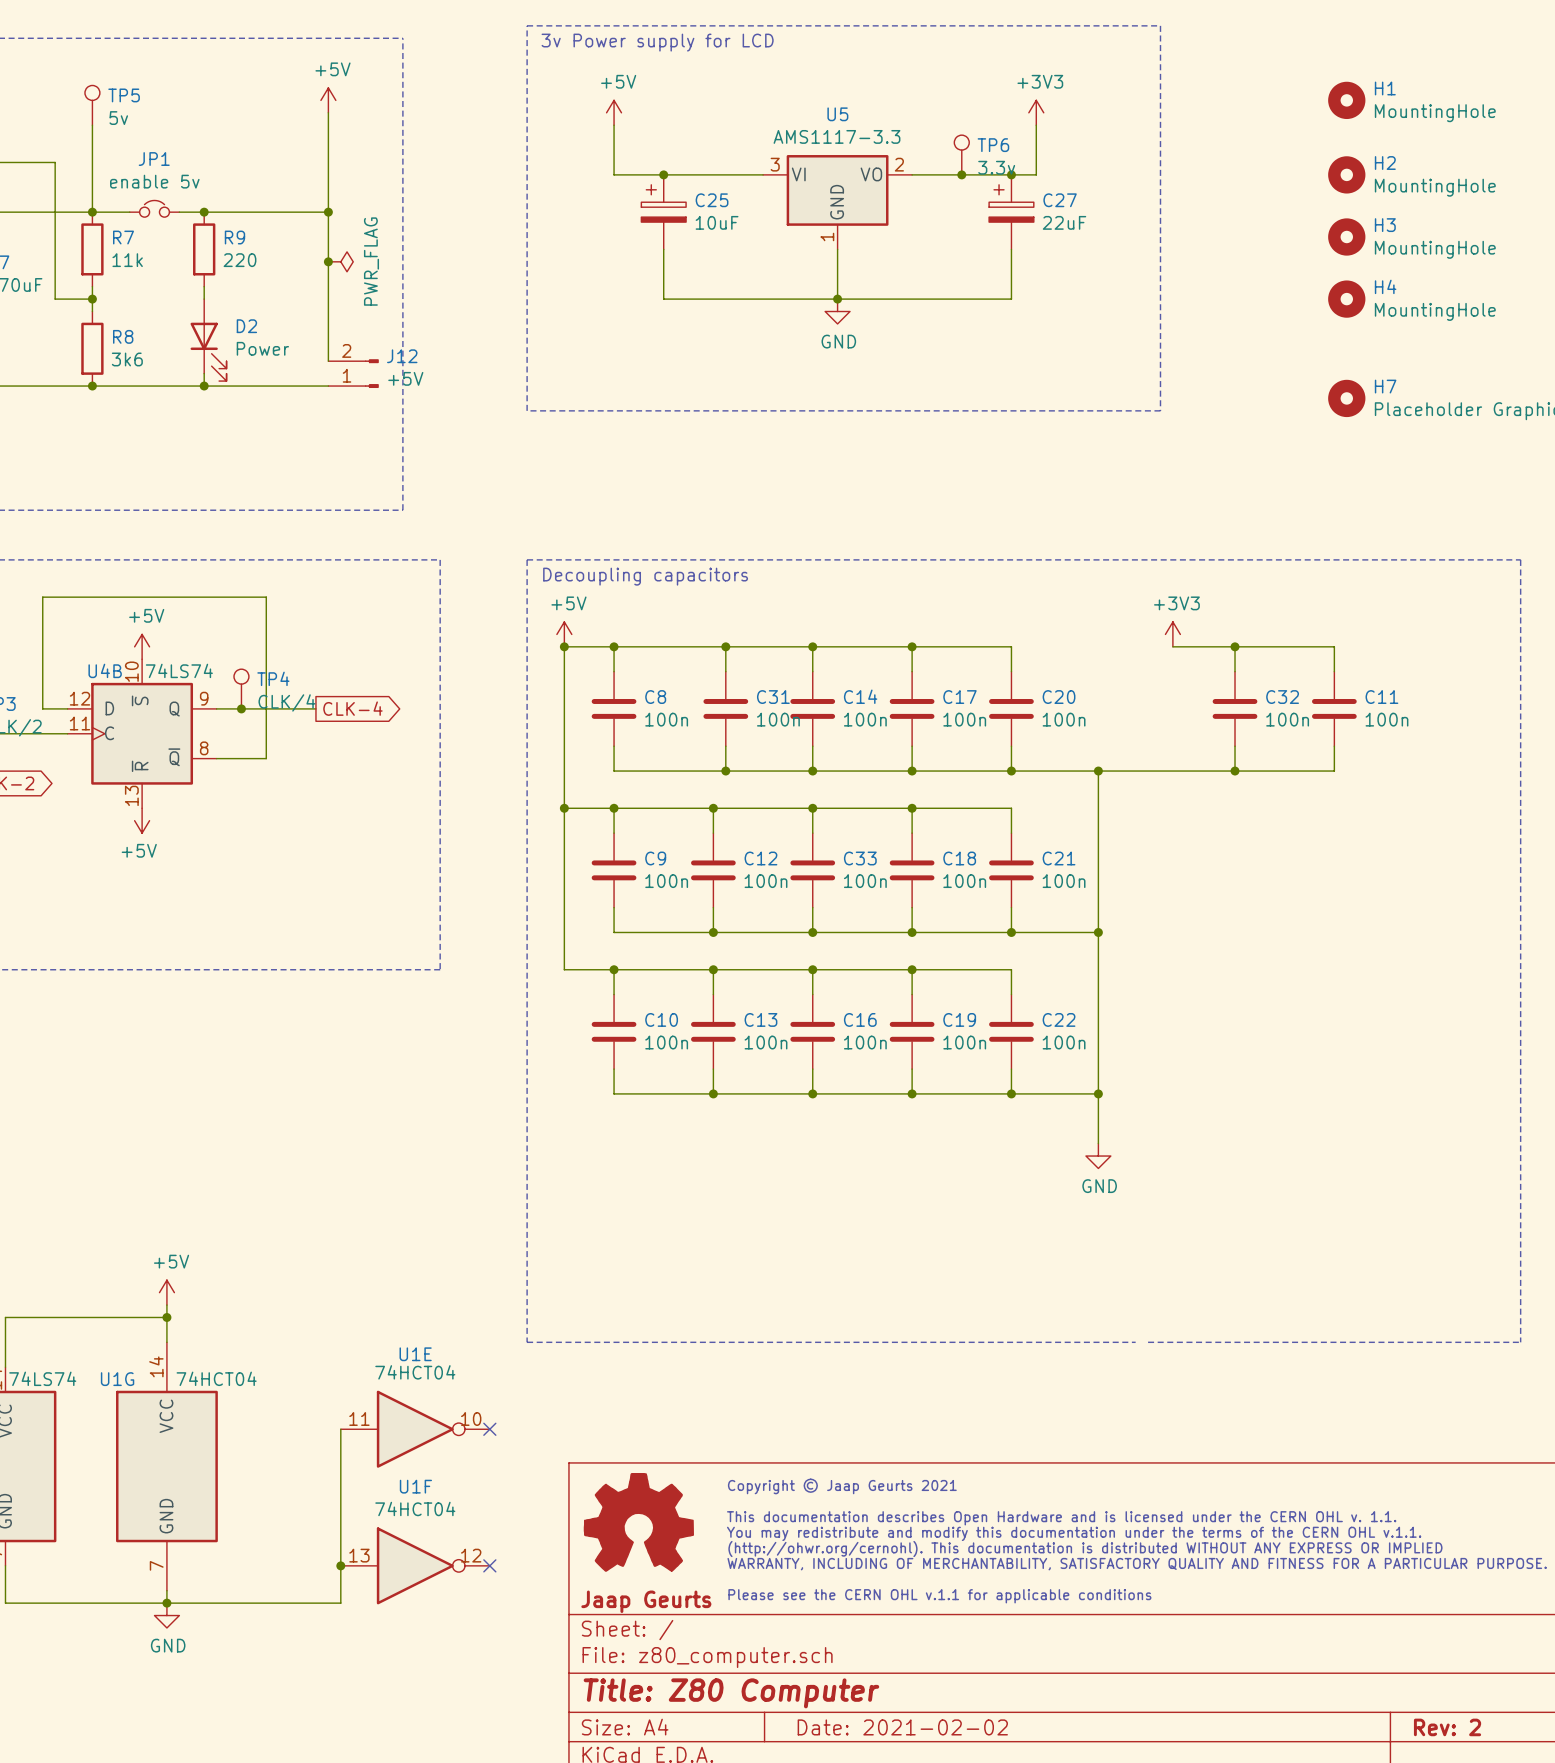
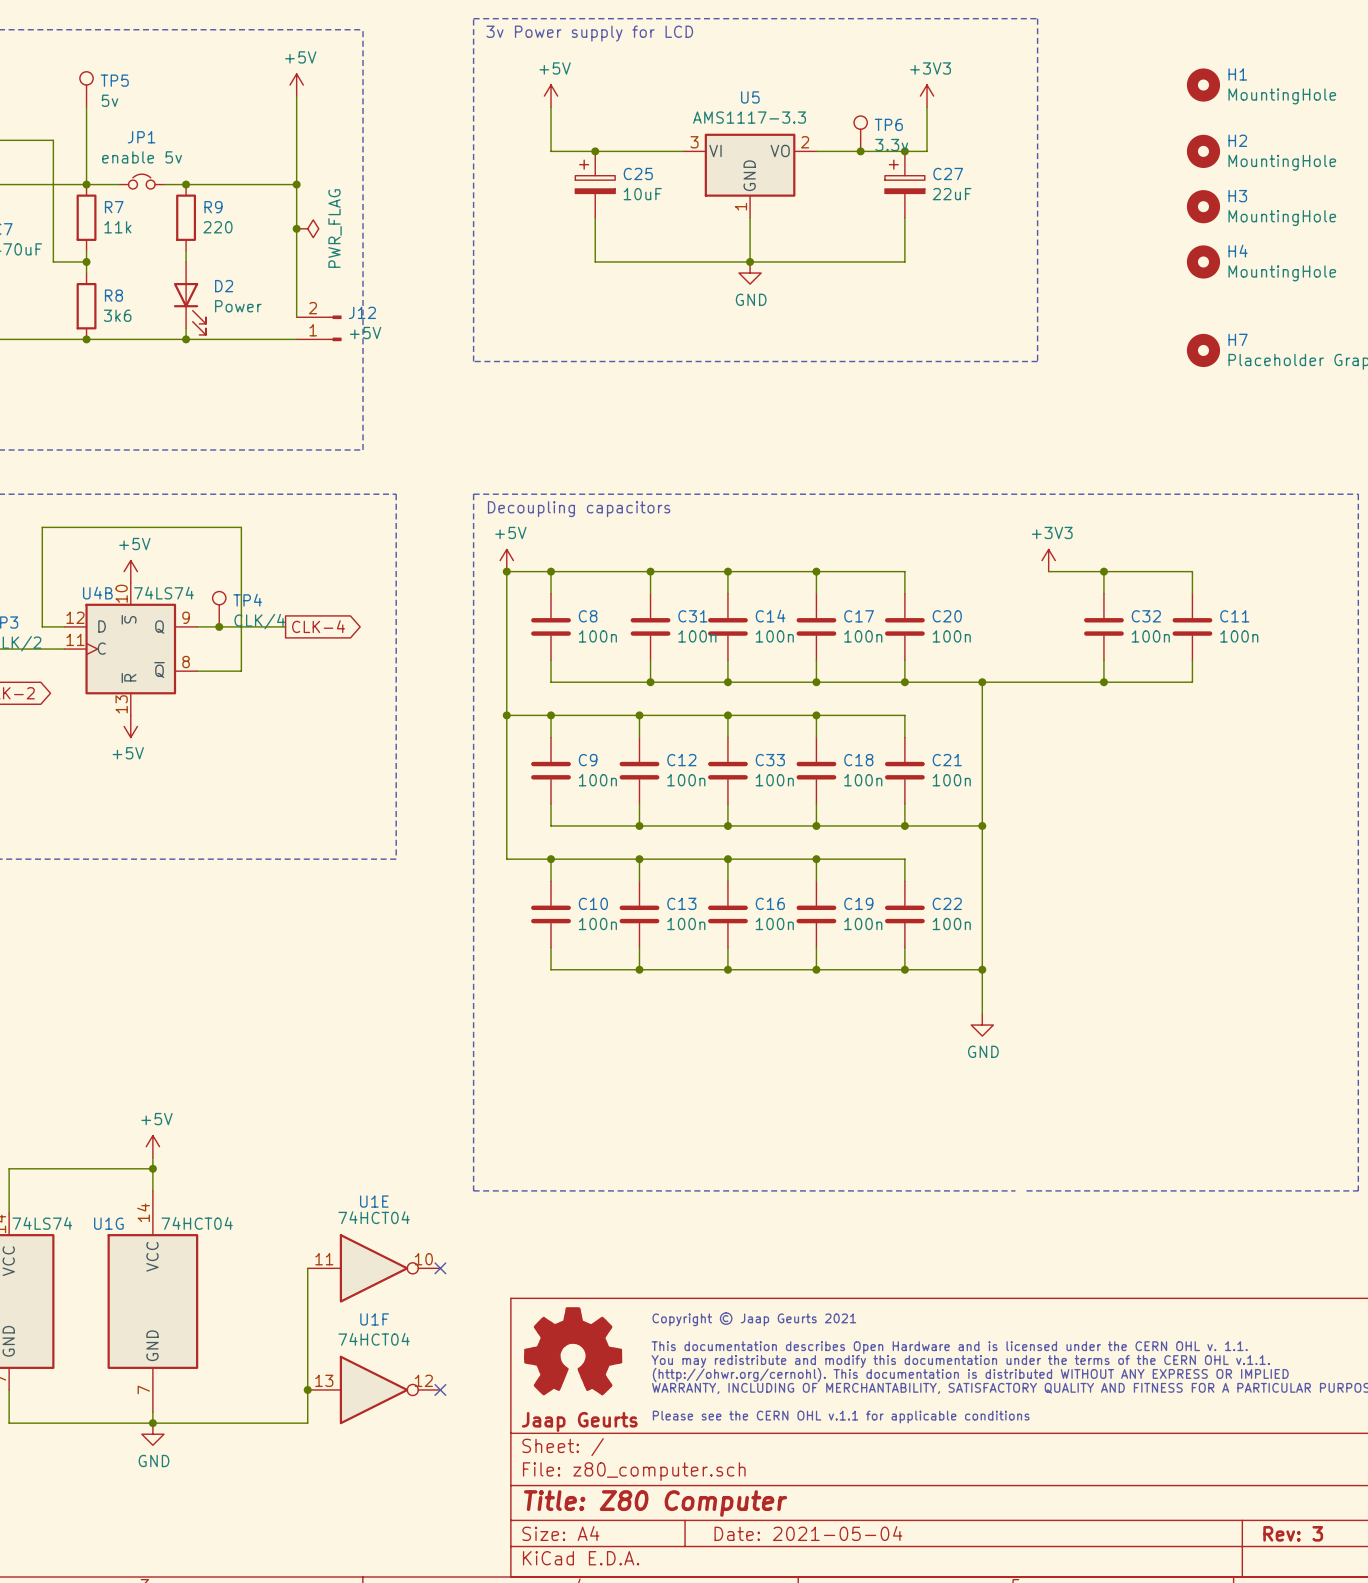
title block: Date: 2021-02-02 (902, 1727) -> Date: 2021-05-04 (808, 1533)
title block: Rev: 2 (1447, 1727) -> Rev: 3 (1293, 1533)

